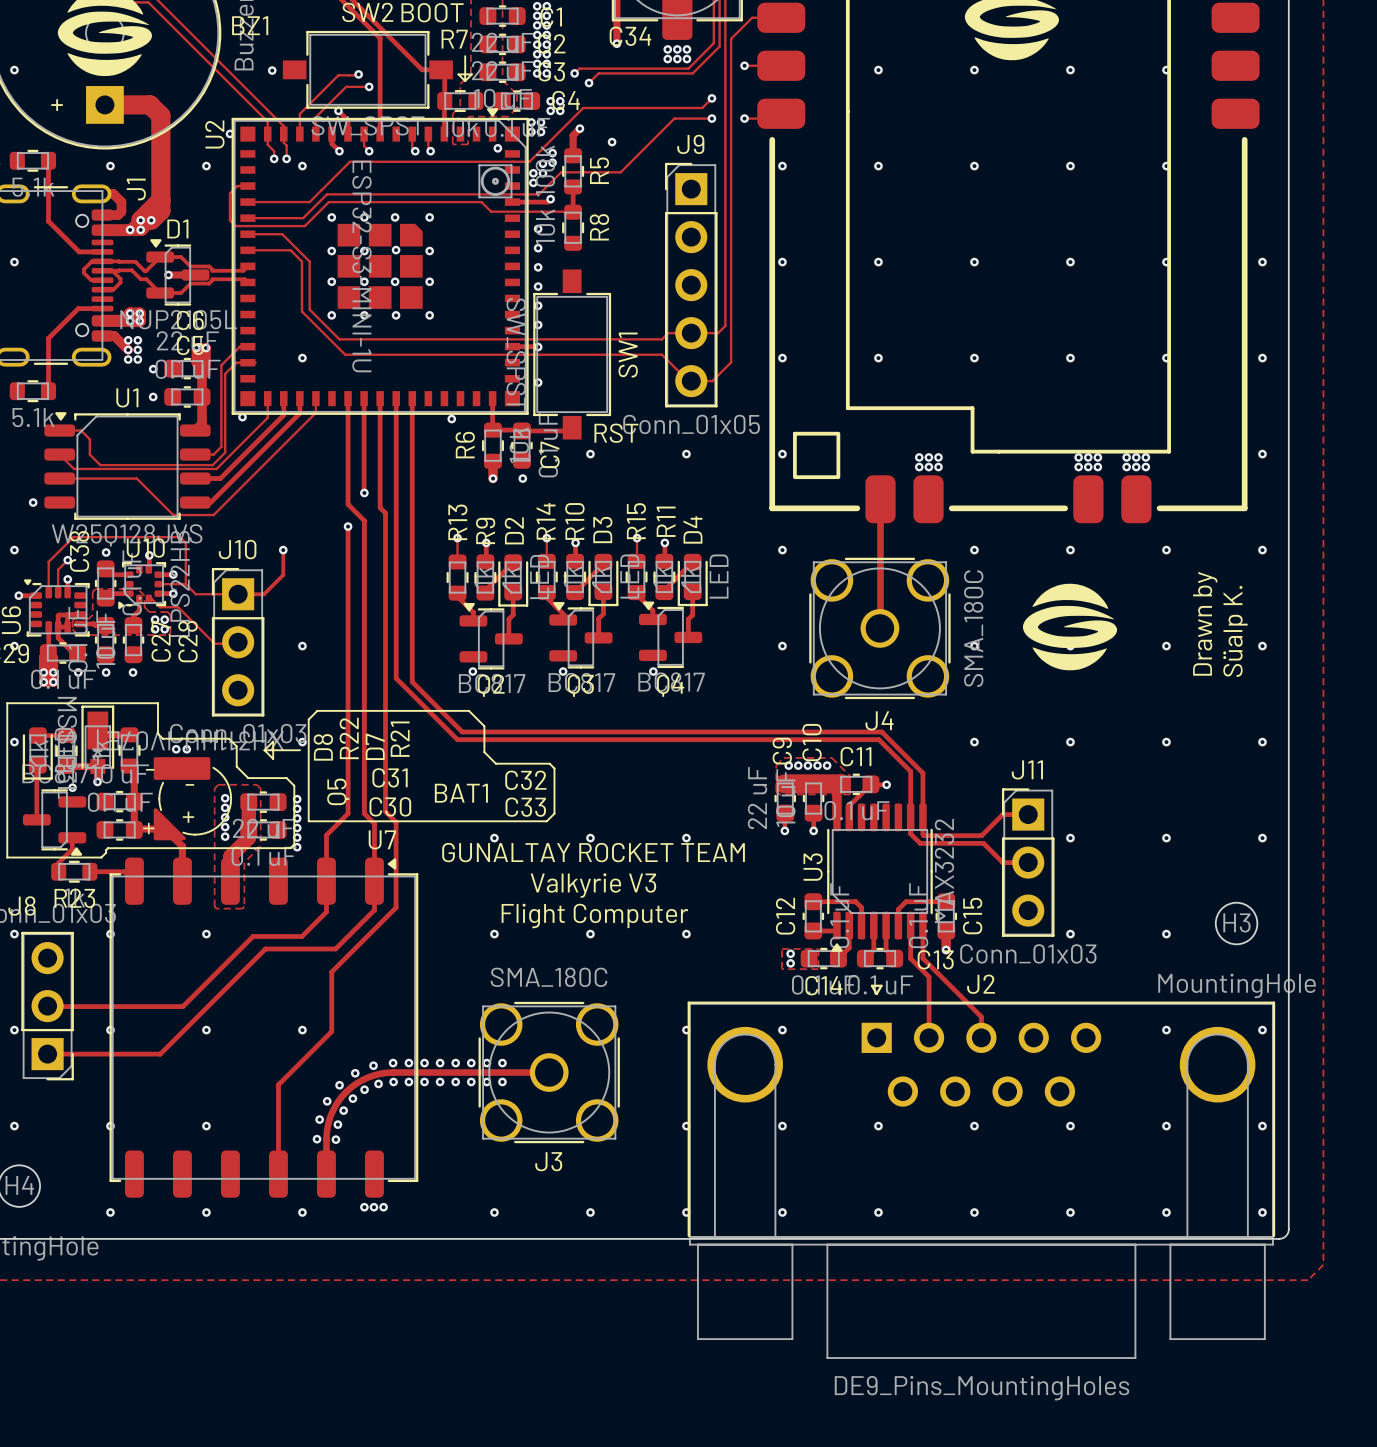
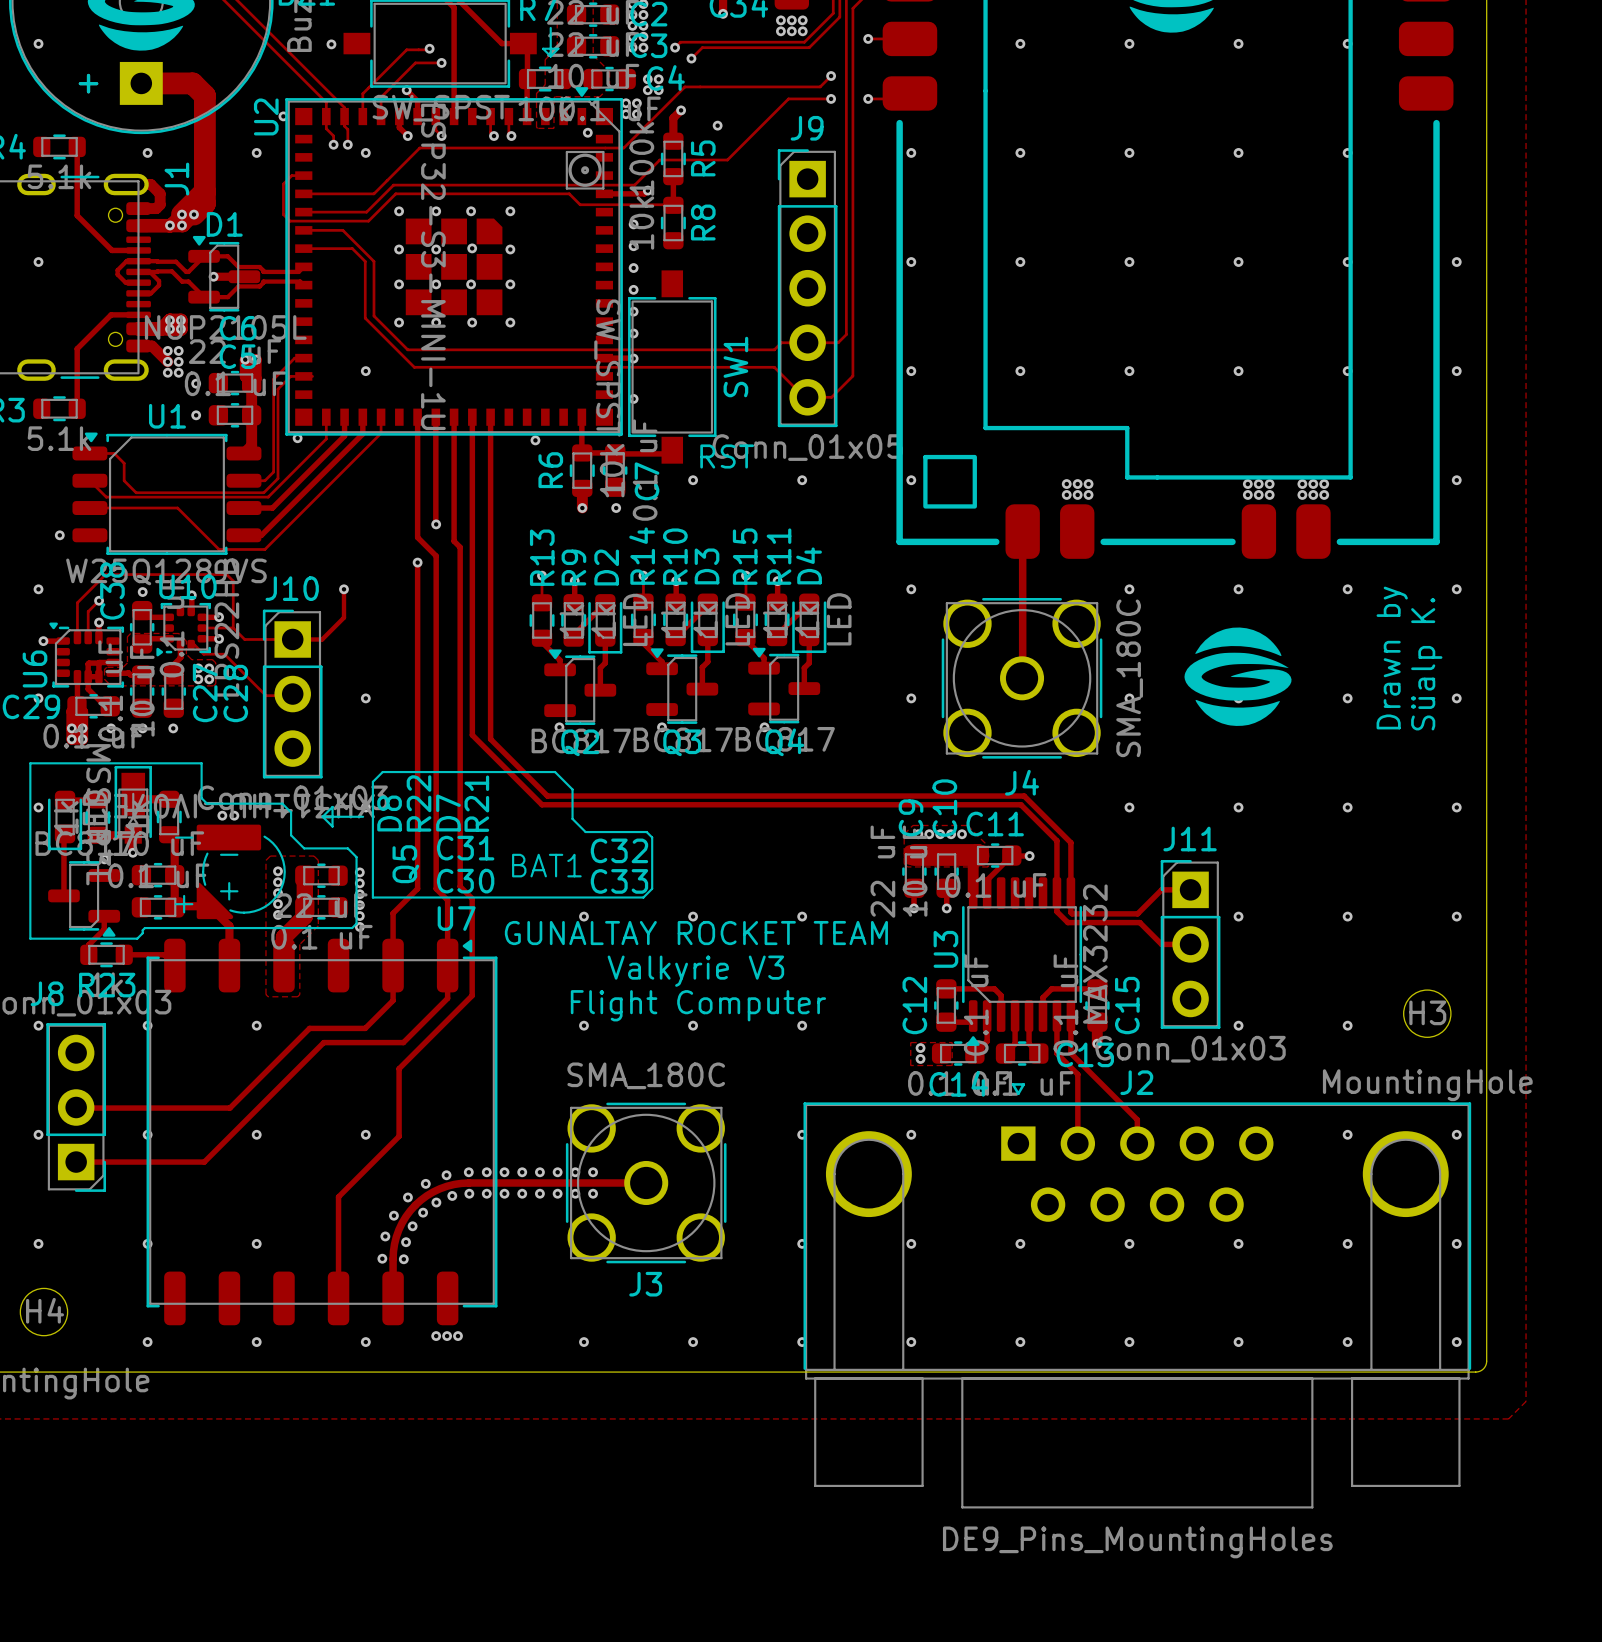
via: (552, 153) -> none
via: (552, 162) -> none
via: (542, 163) -> none
via: (533, 173) -> none
via: (542, 173) -> none
via: (533, 182) -> none

